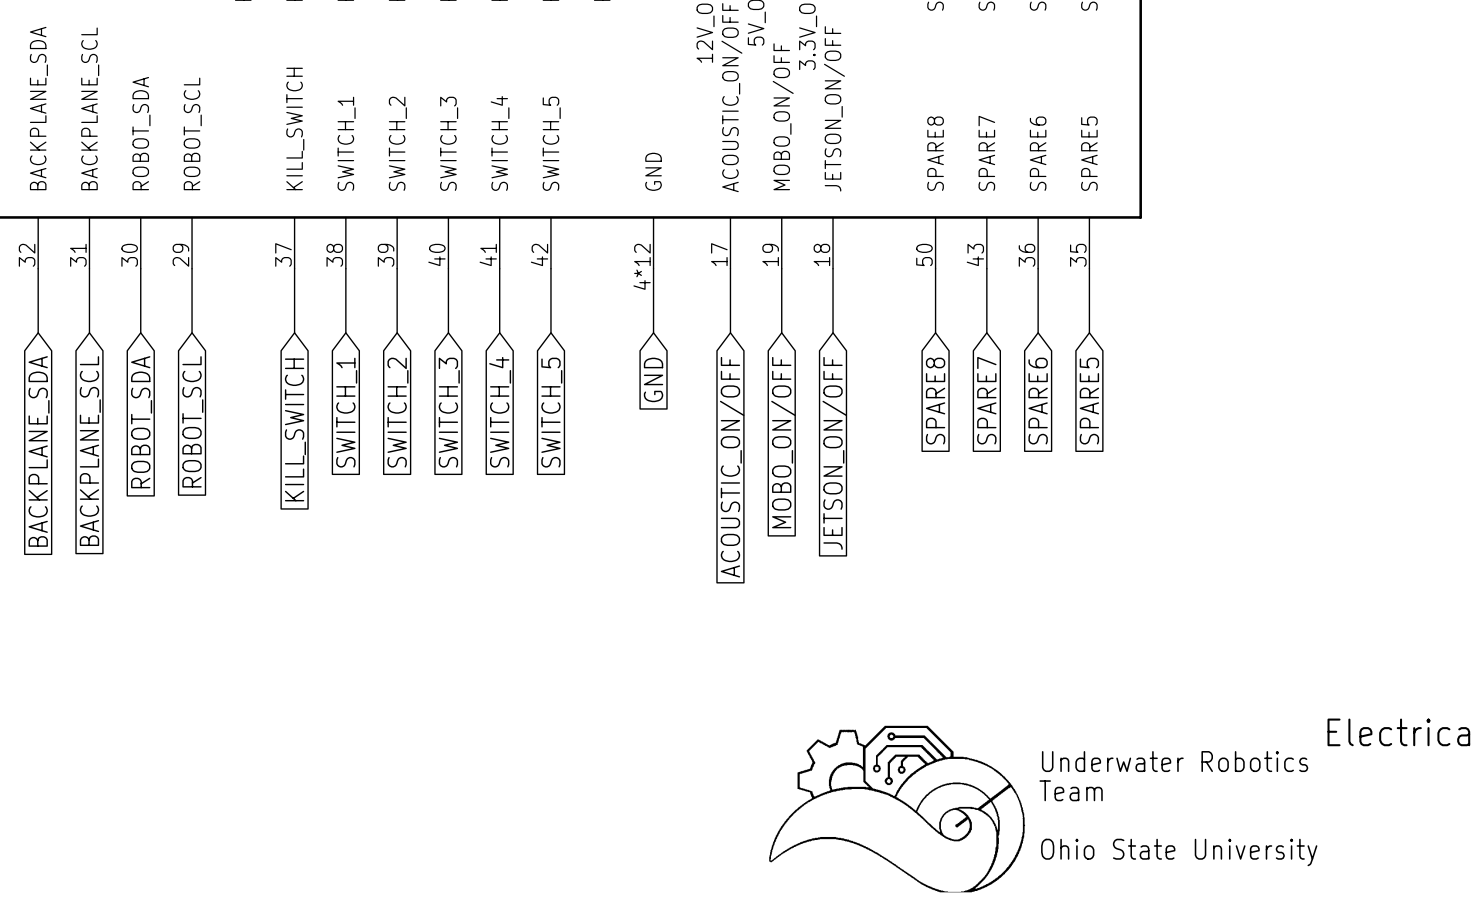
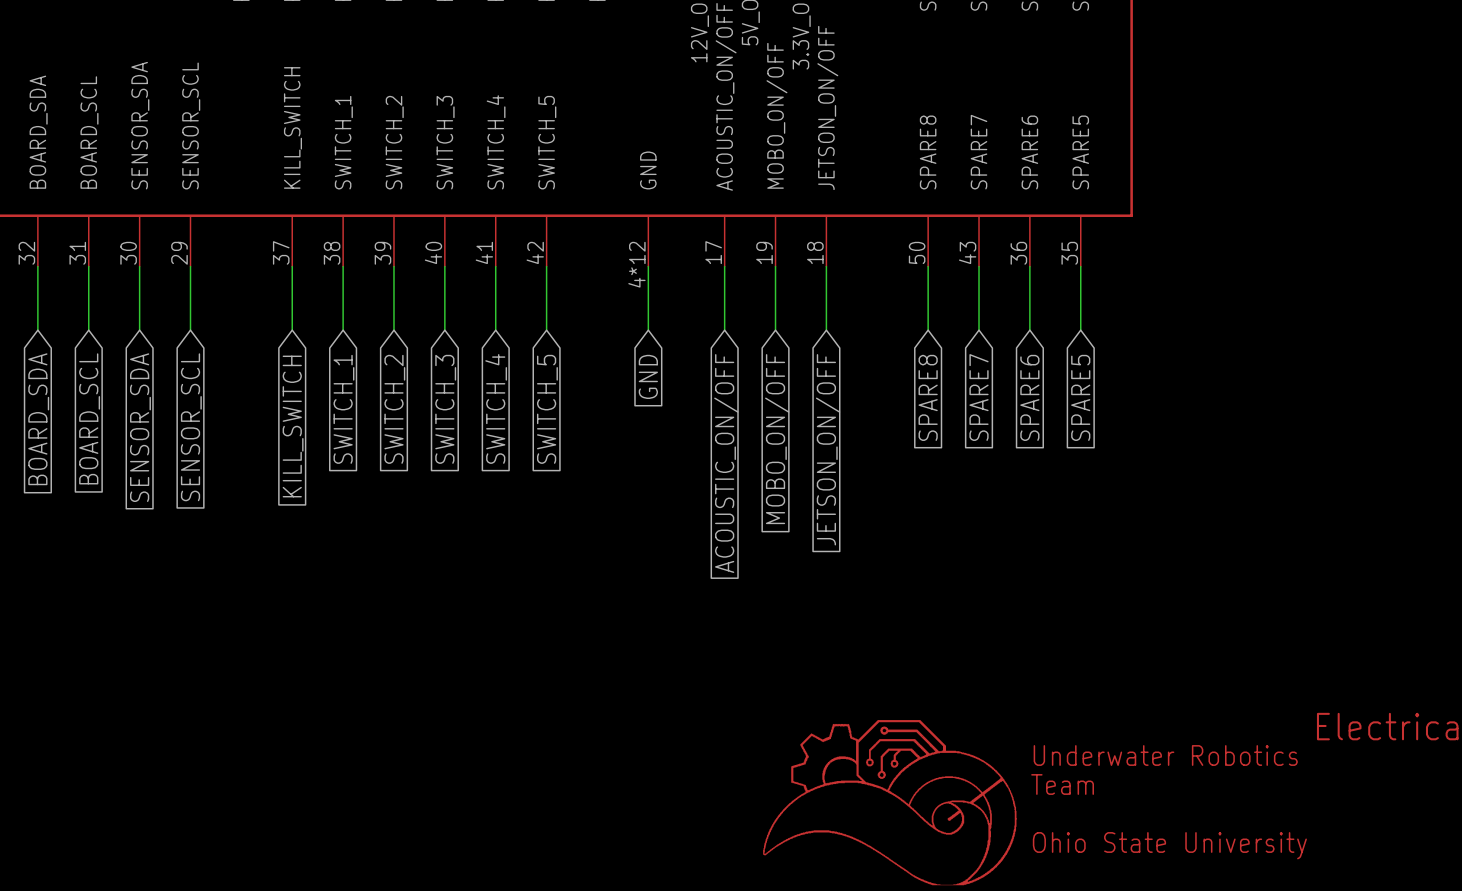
part pin name: BACKPLANE_SDA (38, 108) -> BOARD_SDA (38, 132)
part pin name: BACKPLANE_SCL (90, 108) -> BOARD_SCL (89, 132)
part pin name: ROBOT_SDA (141, 133) -> SENSOR_SDA (140, 125)
part pin name: ROBOT_SCL (192, 133) -> SENSOR_SCL (191, 125)
global label: ROBOT_SCL (192, 421) -> SENSOR_SCL (191, 427)
global label: ROBOT_SDA (141, 422) -> SENSOR_SDA (140, 427)
global label: BACKPLANE_SDA (39, 451) -> BOARD_SDA (38, 419)
global label: BACKPLANE_SCL (90, 451) -> BOARD_SCL (89, 418)

